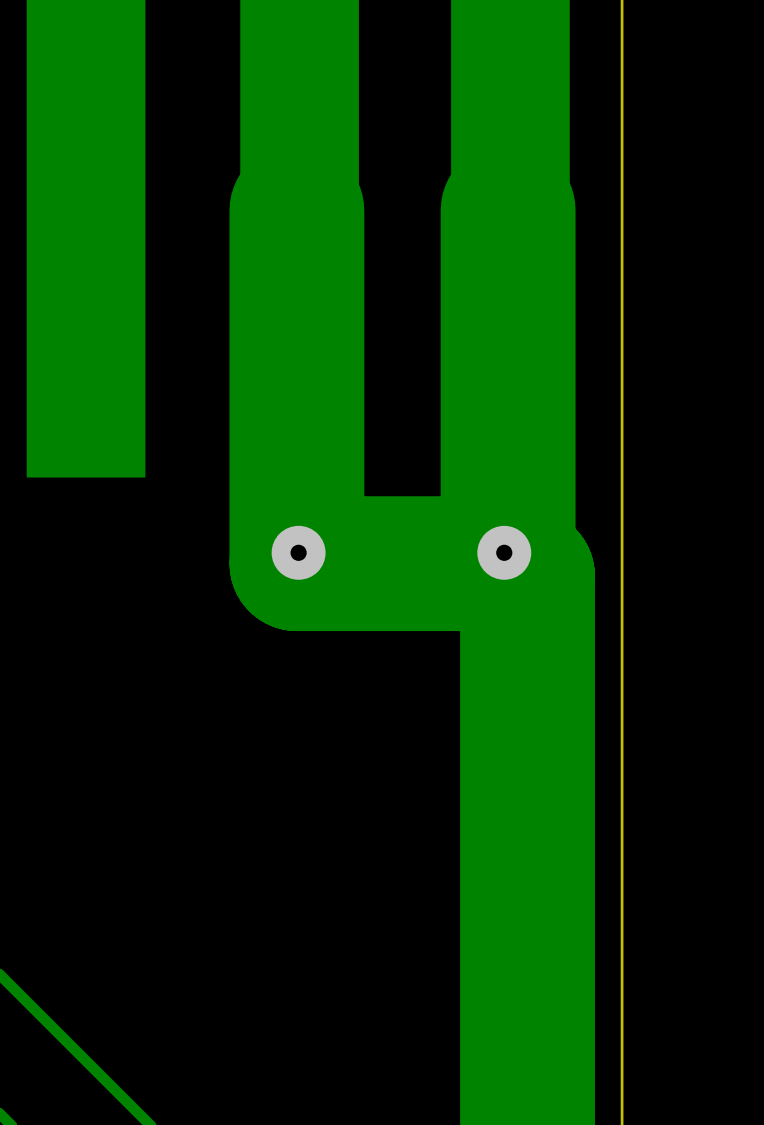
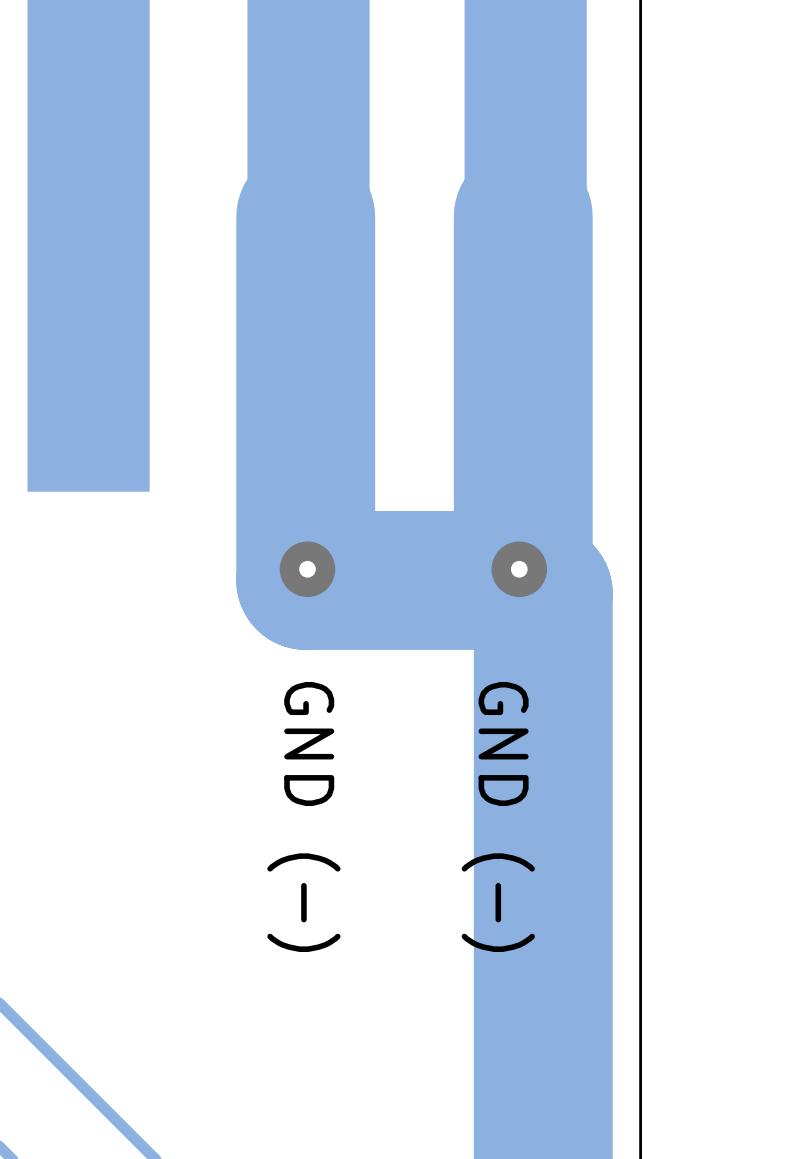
text: none -> GND (-) (303, 816)
text: none -> GND (-) (498, 816)

